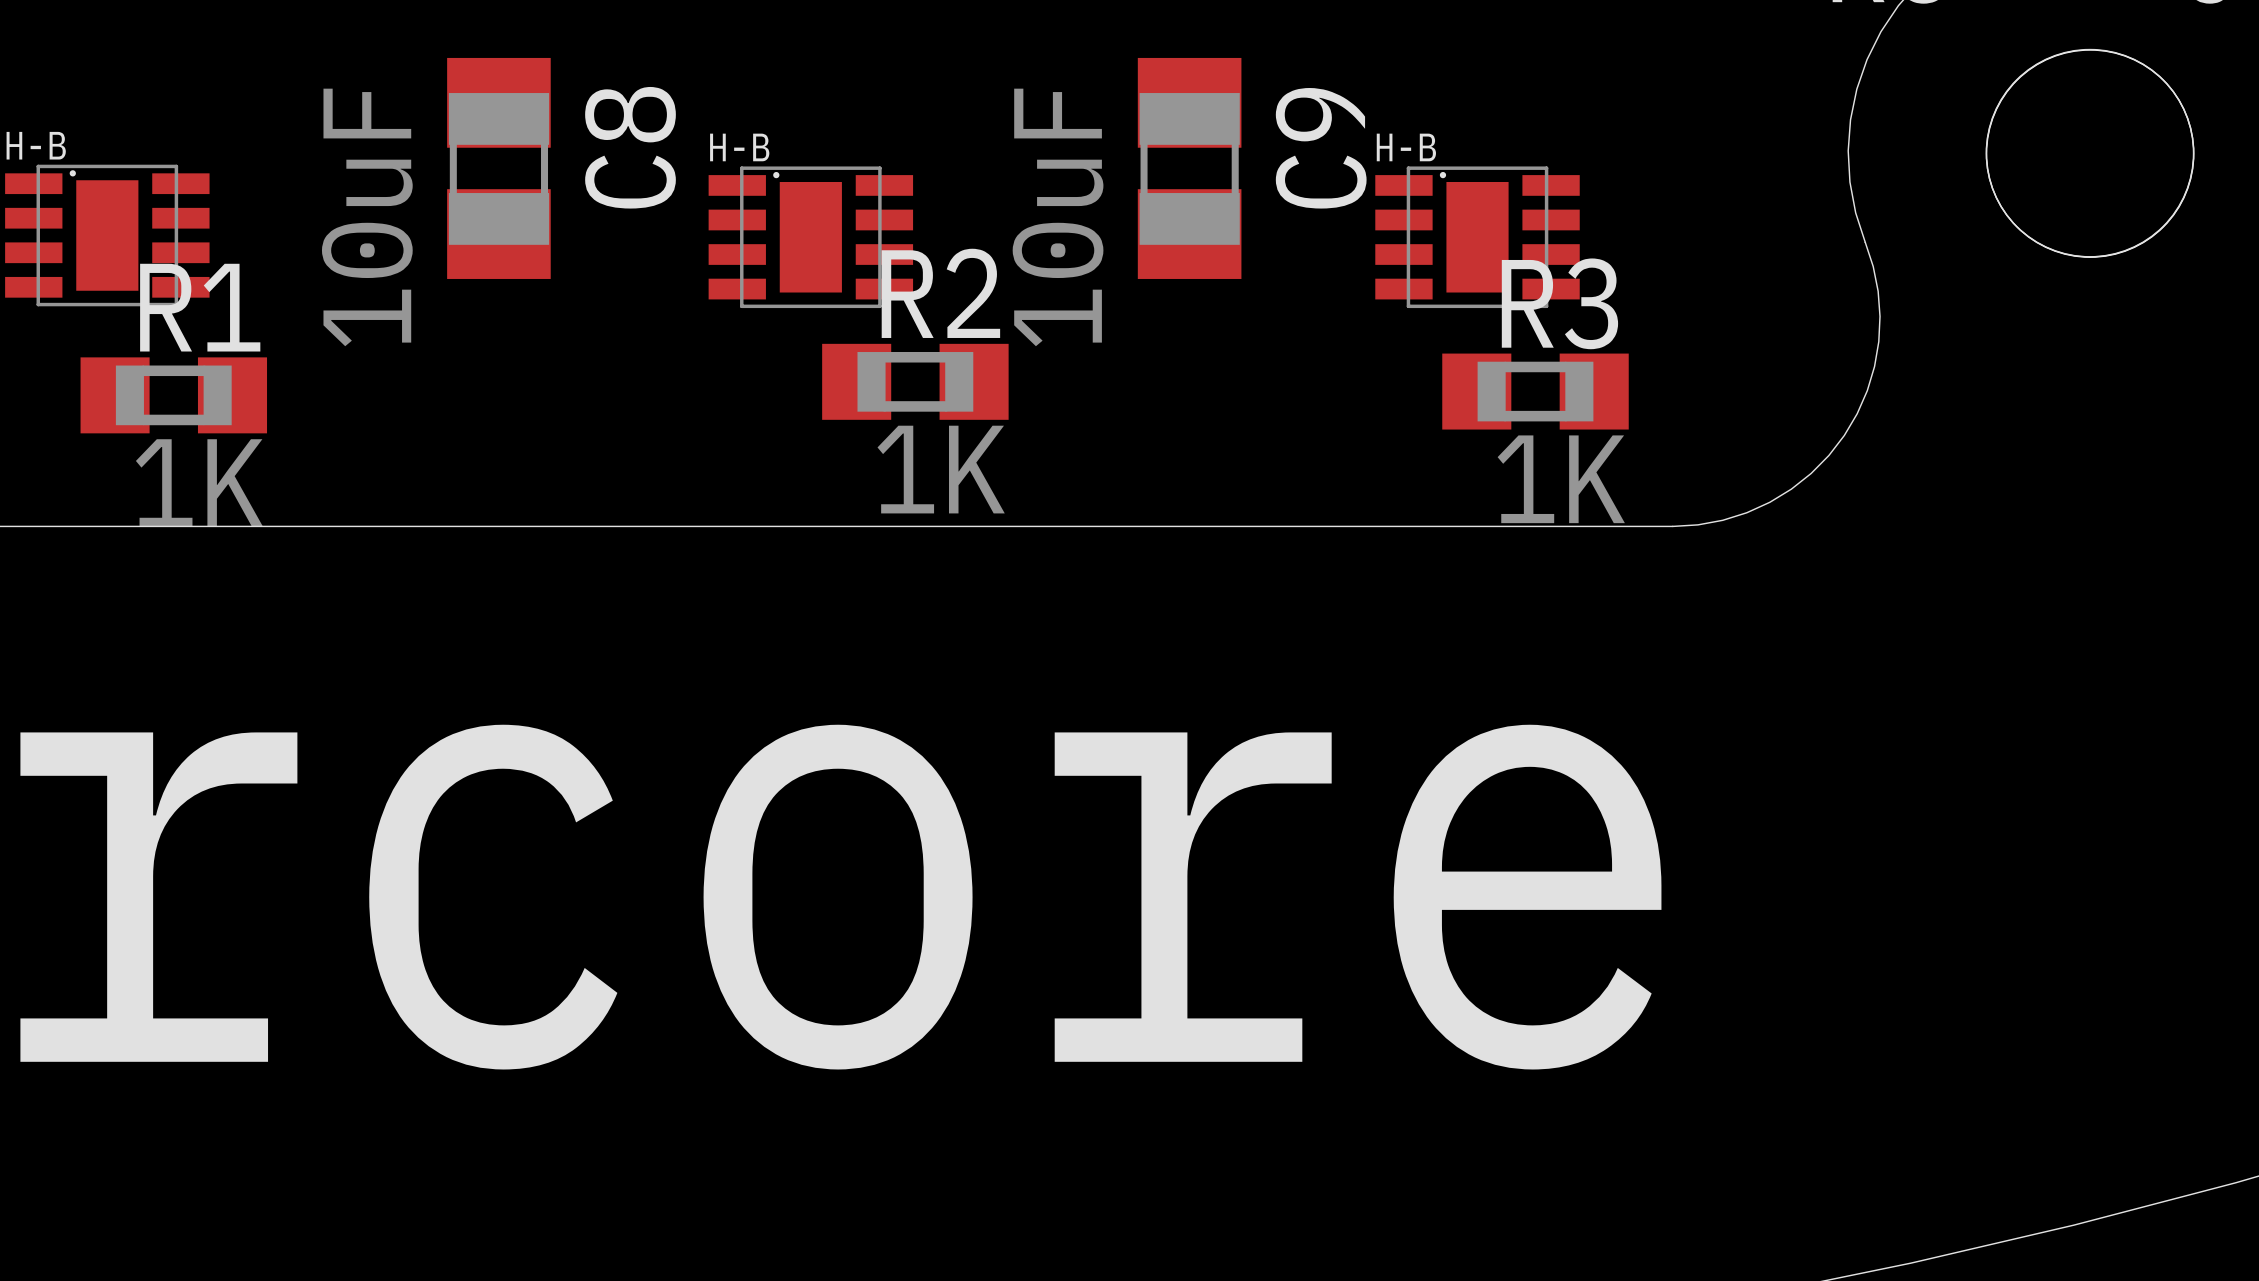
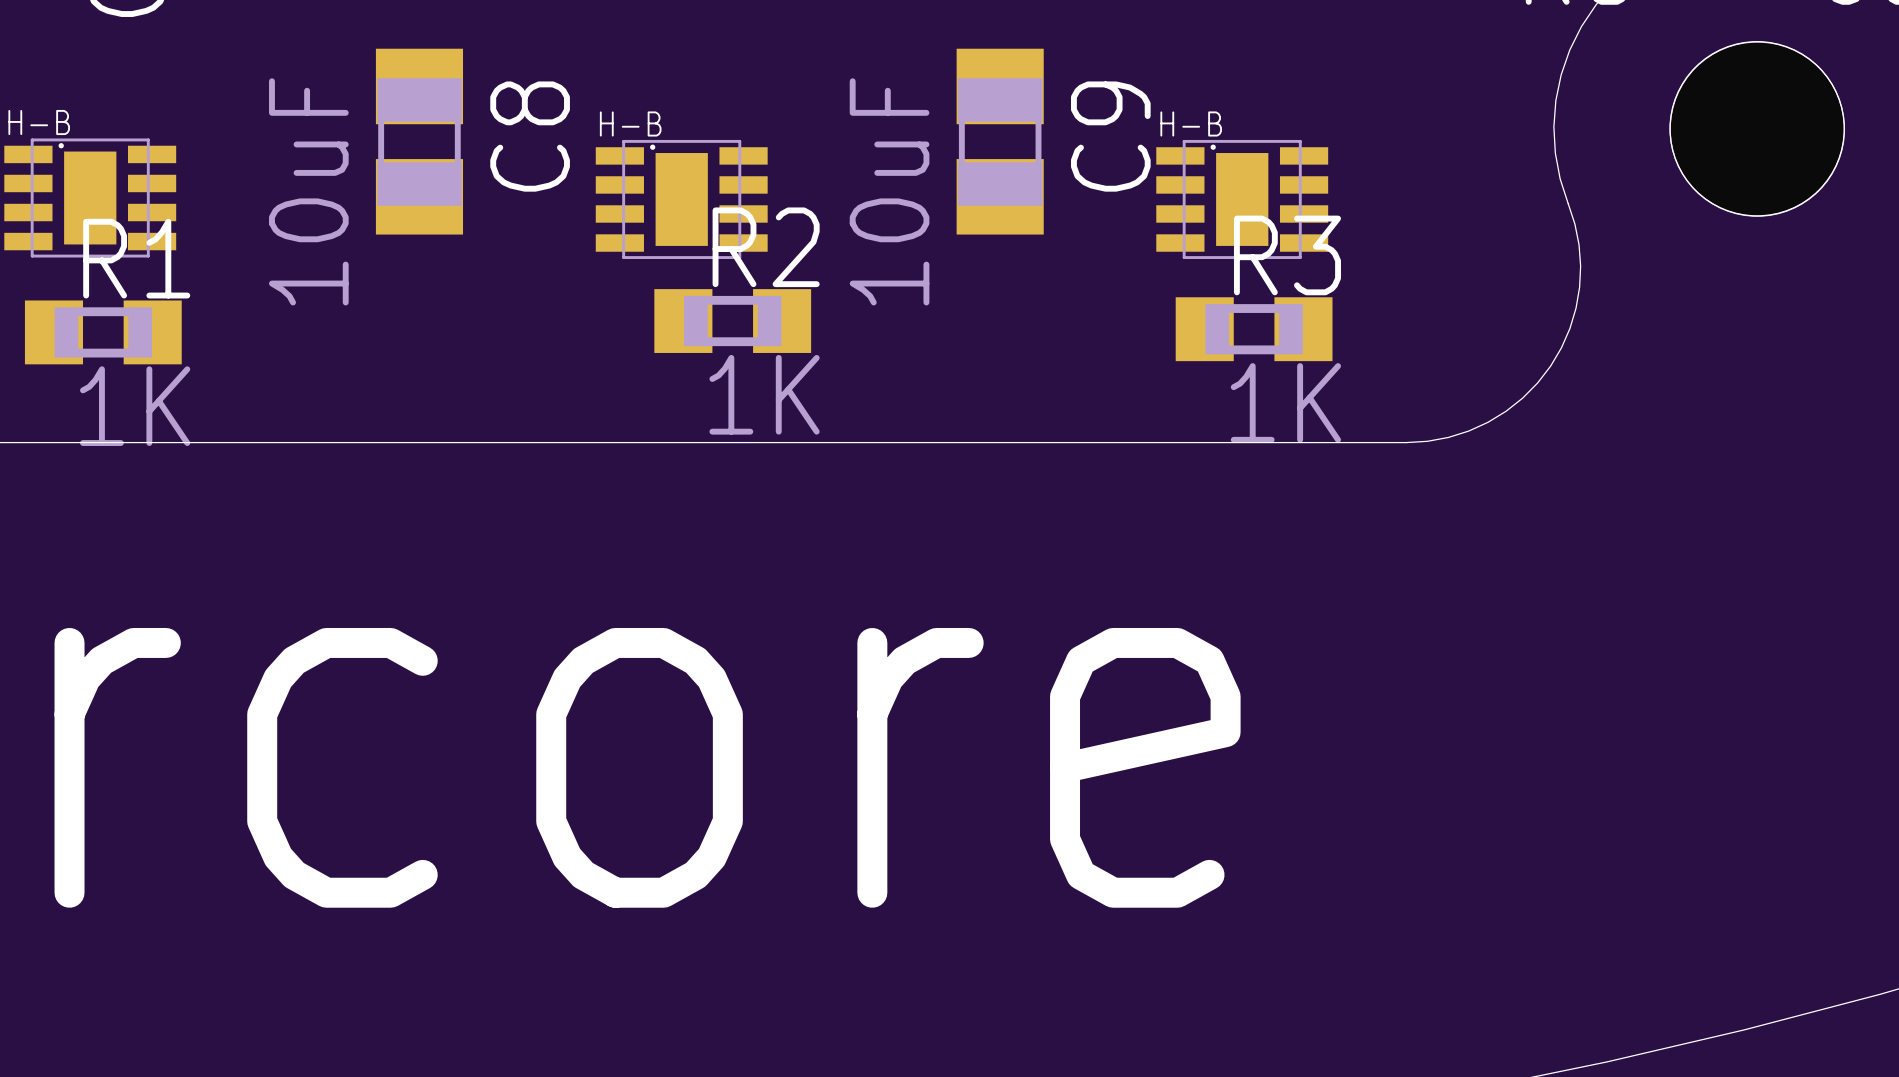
R2 position: (915, 381) -> (732, 321)
R3 position: (1535, 391) -> (1254, 329)
R1 position: (173, 395) -> (103, 332)

